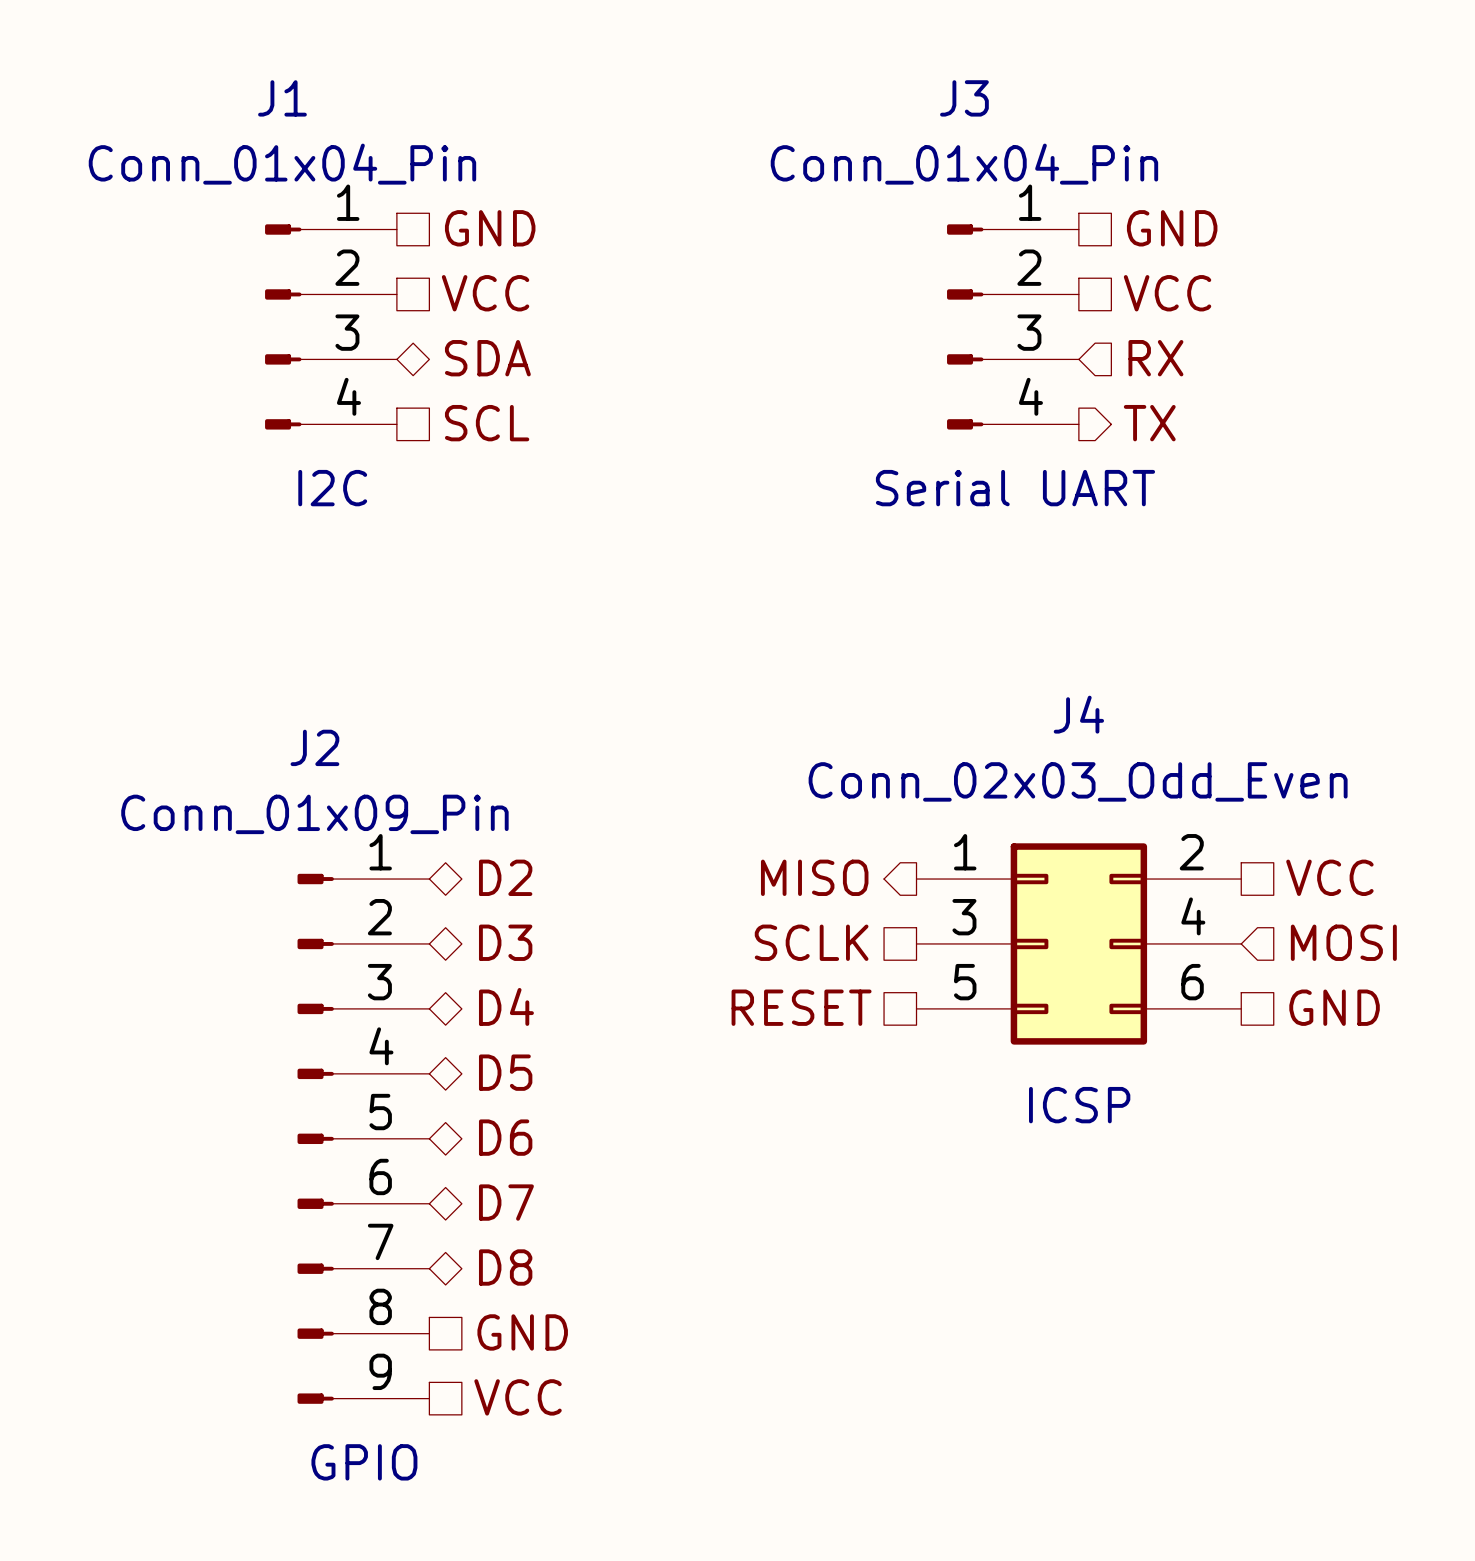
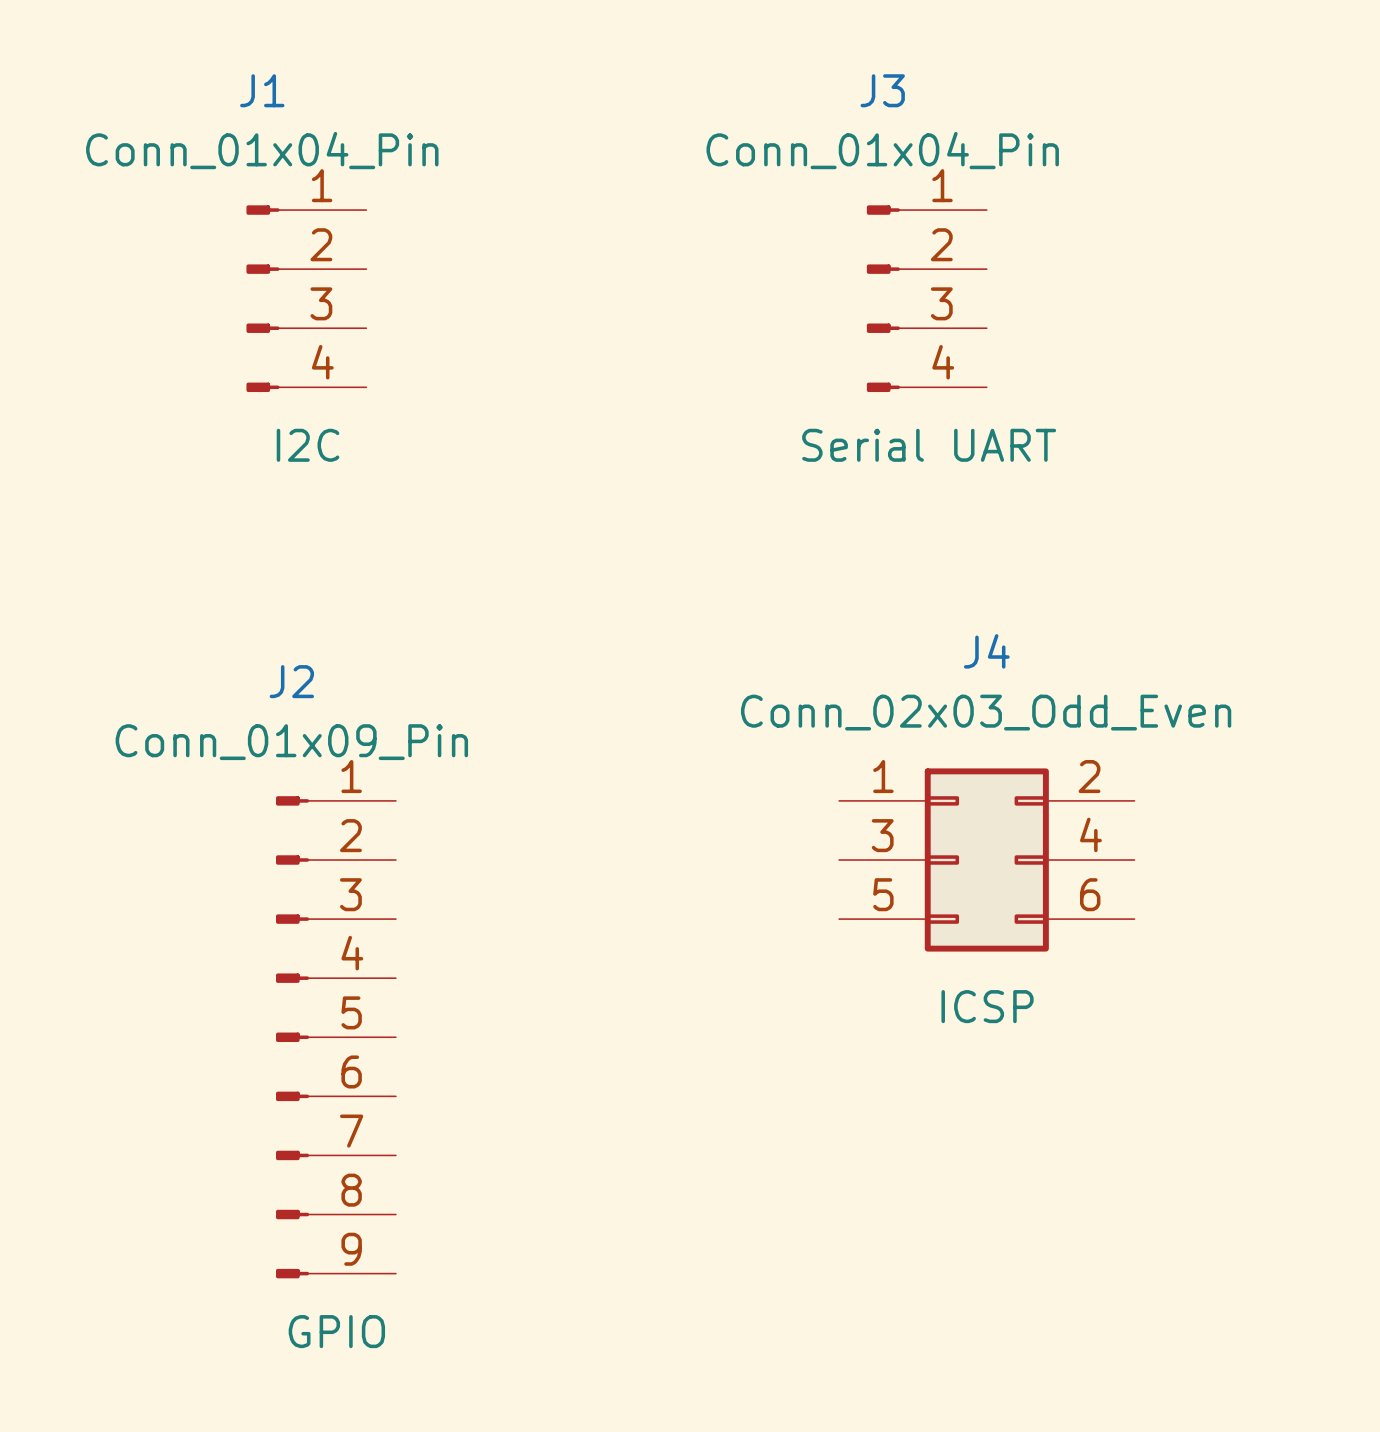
hierarchical label: GND (490, 228) -> none
hierarchical label: GND (1172, 228) -> none
hierarchical label: VCC (485, 293) -> none
hierarchical label: VCC (1167, 293) -> none
hierarchical label: SDA (487, 358) -> none
hierarchical label: RX (1155, 358) -> none
hierarchical label: SCL (487, 423) -> none
hierarchical label: TX (1149, 423) -> none
hierarchical label: D2 (505, 877) -> none
hierarchical label: MISO (814, 877) -> none
hierarchical label: VCC (1329, 877) -> none
hierarchical label: D3 (505, 942) -> none
hierarchical label: SCLK (811, 942) -> none
hierarchical label: MOSI (1343, 942) -> none
hierarchical label: D4 (506, 1006) -> none
hierarchical label: RESET (801, 1007) -> none
hierarchical label: GND (1334, 1007) -> none
hierarchical label: D5 (505, 1072) -> none
hierarchical label: D6 (505, 1137) -> none
hierarchical label: D7 (506, 1202) -> none
hierarchical label: D8 (505, 1267) -> none
hierarchical label: GND (522, 1332) -> none
hierarchical label: VCC (518, 1397) -> none

